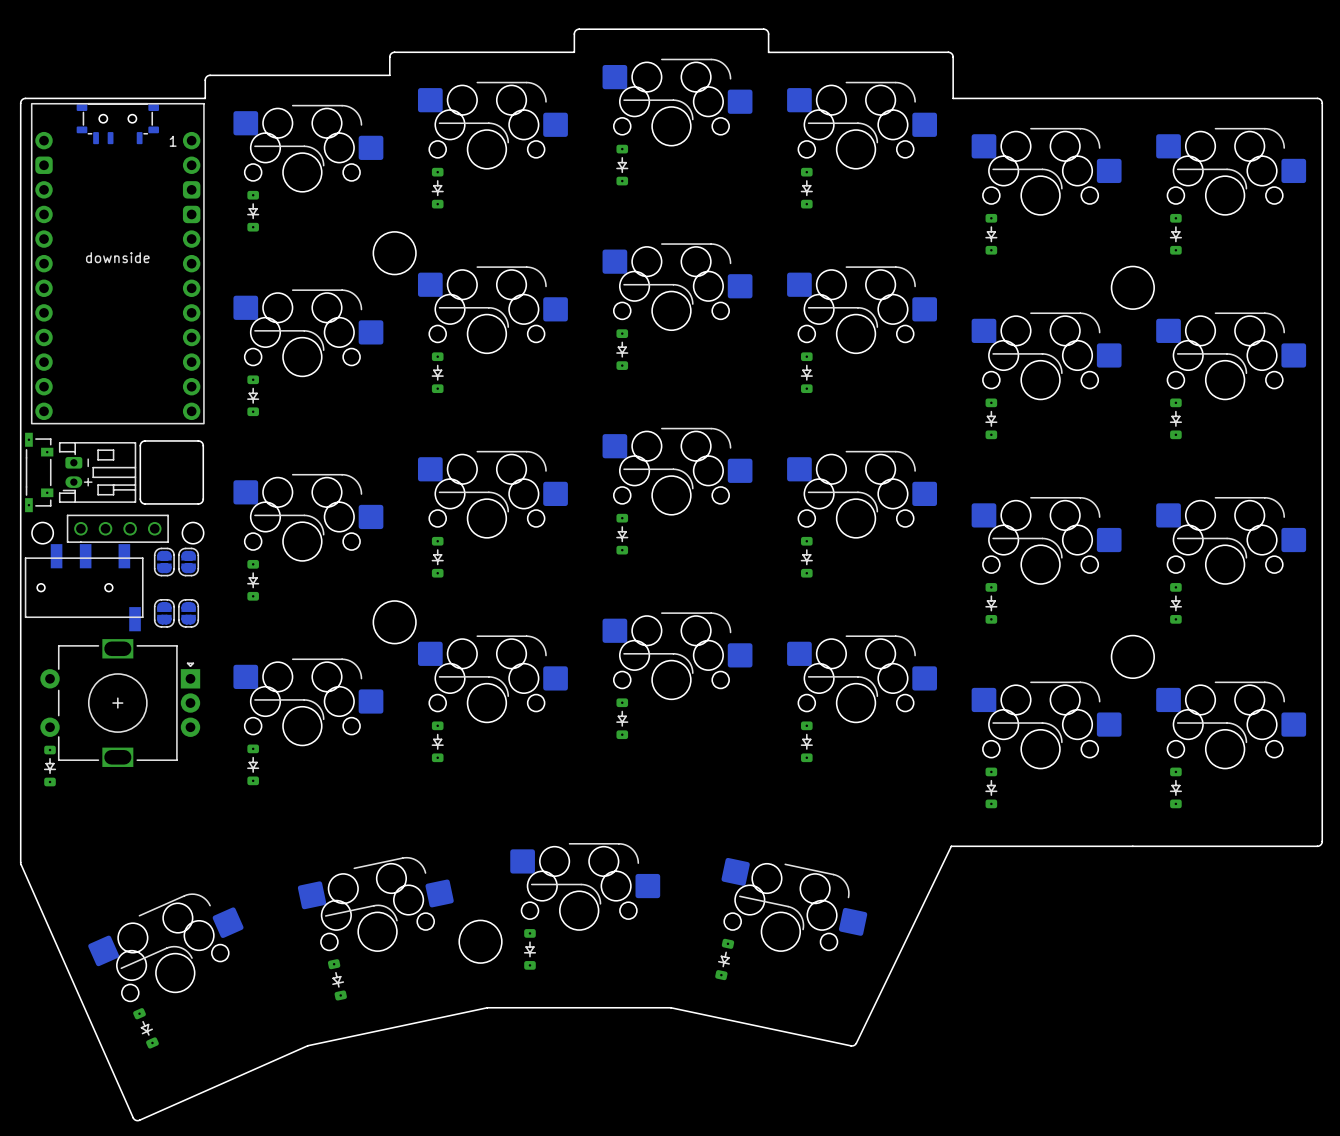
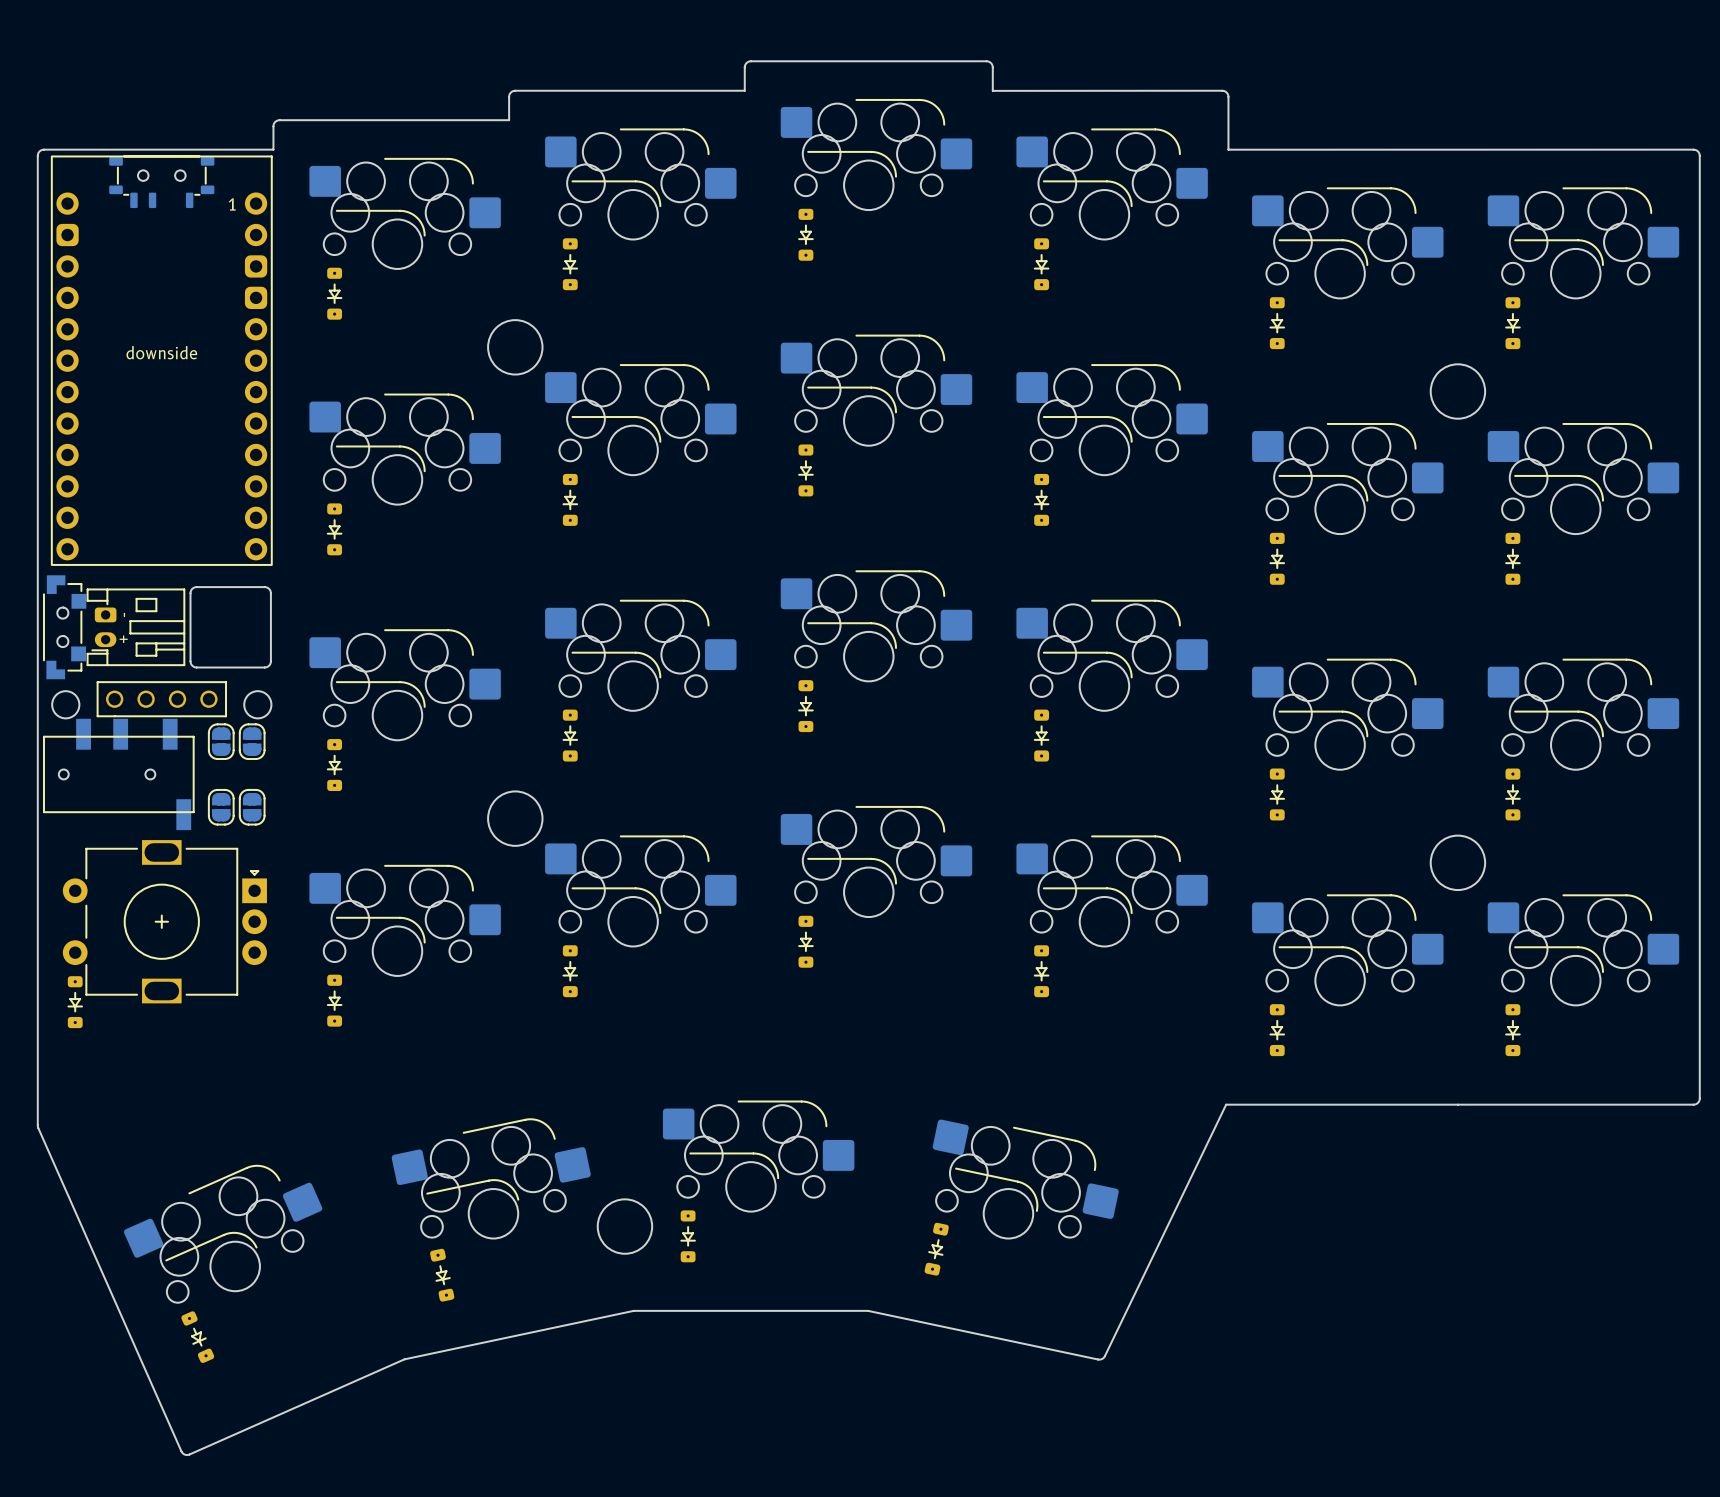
part footprint: [25, 432, 54, 513] -> [43, 575, 87, 680]

